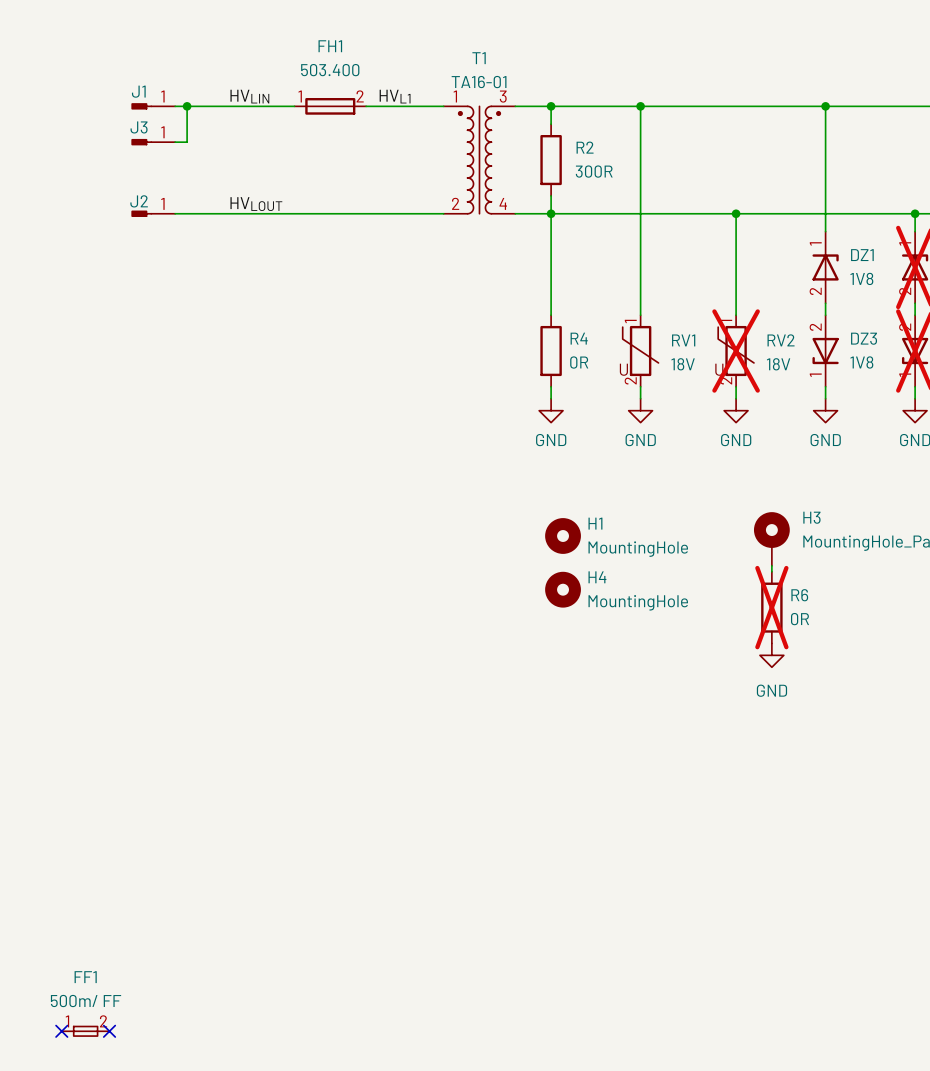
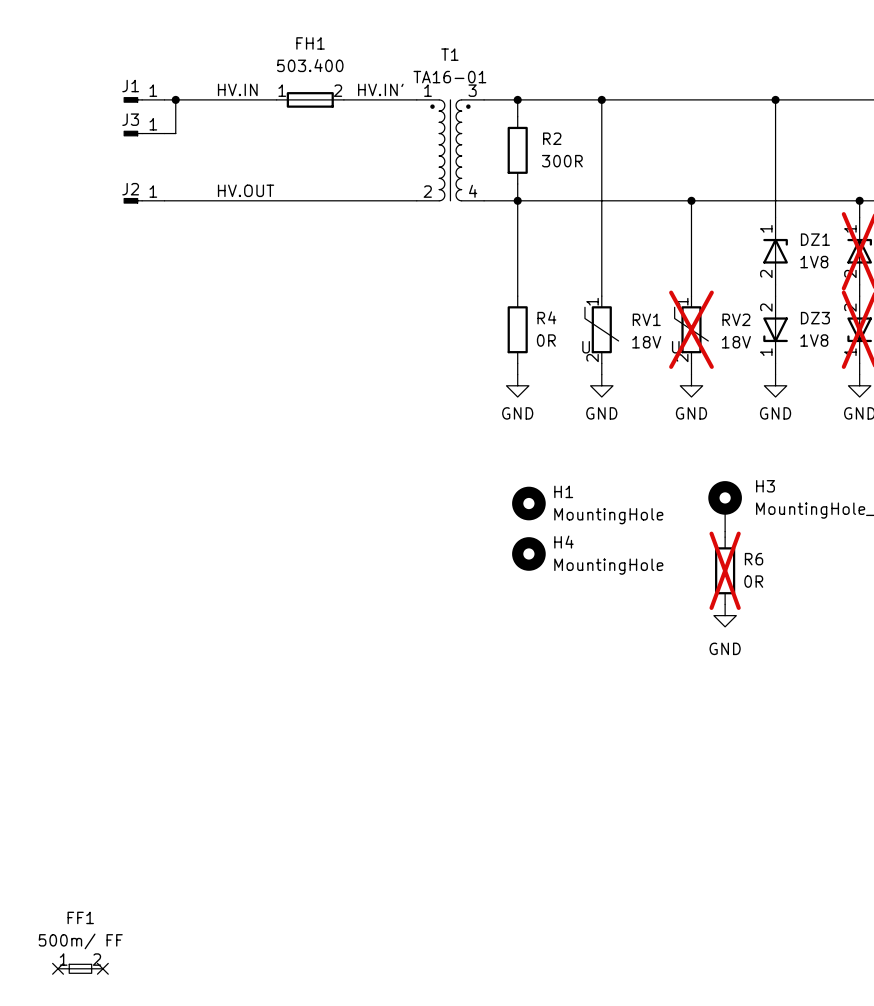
label: HVLIN (249, 96) -> HV.IN (237, 89)
label: HVL1 (395, 96) -> HV.IN' (380, 89)
label: HVLOUT (256, 204) -> HV.OUT (246, 190)

